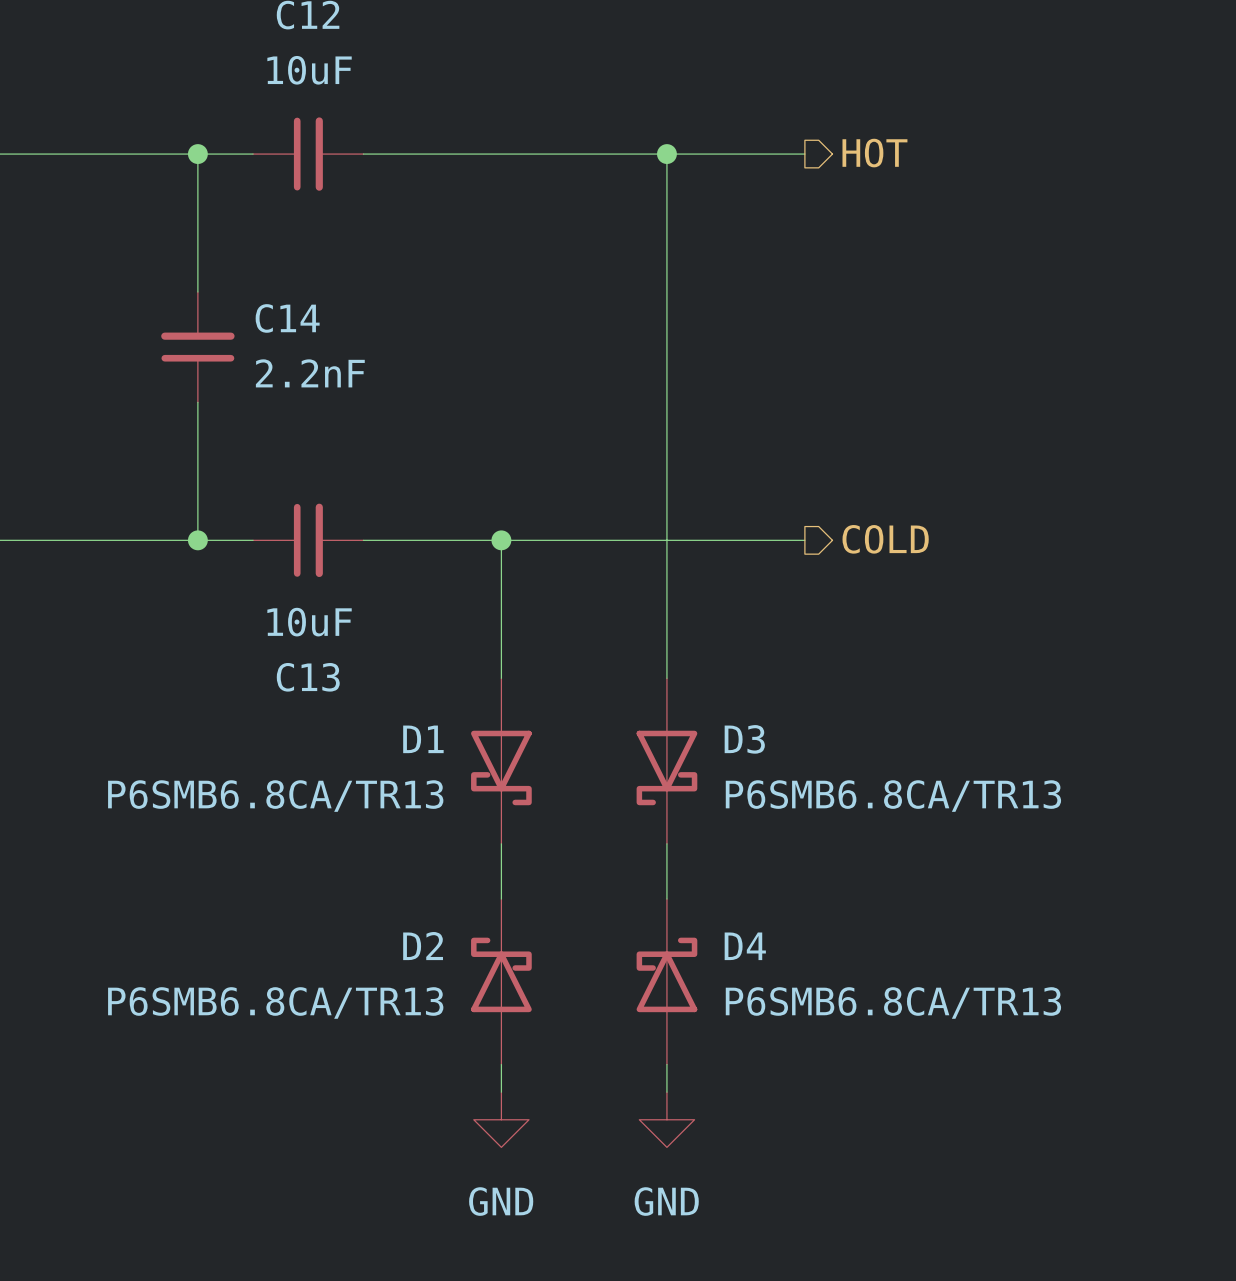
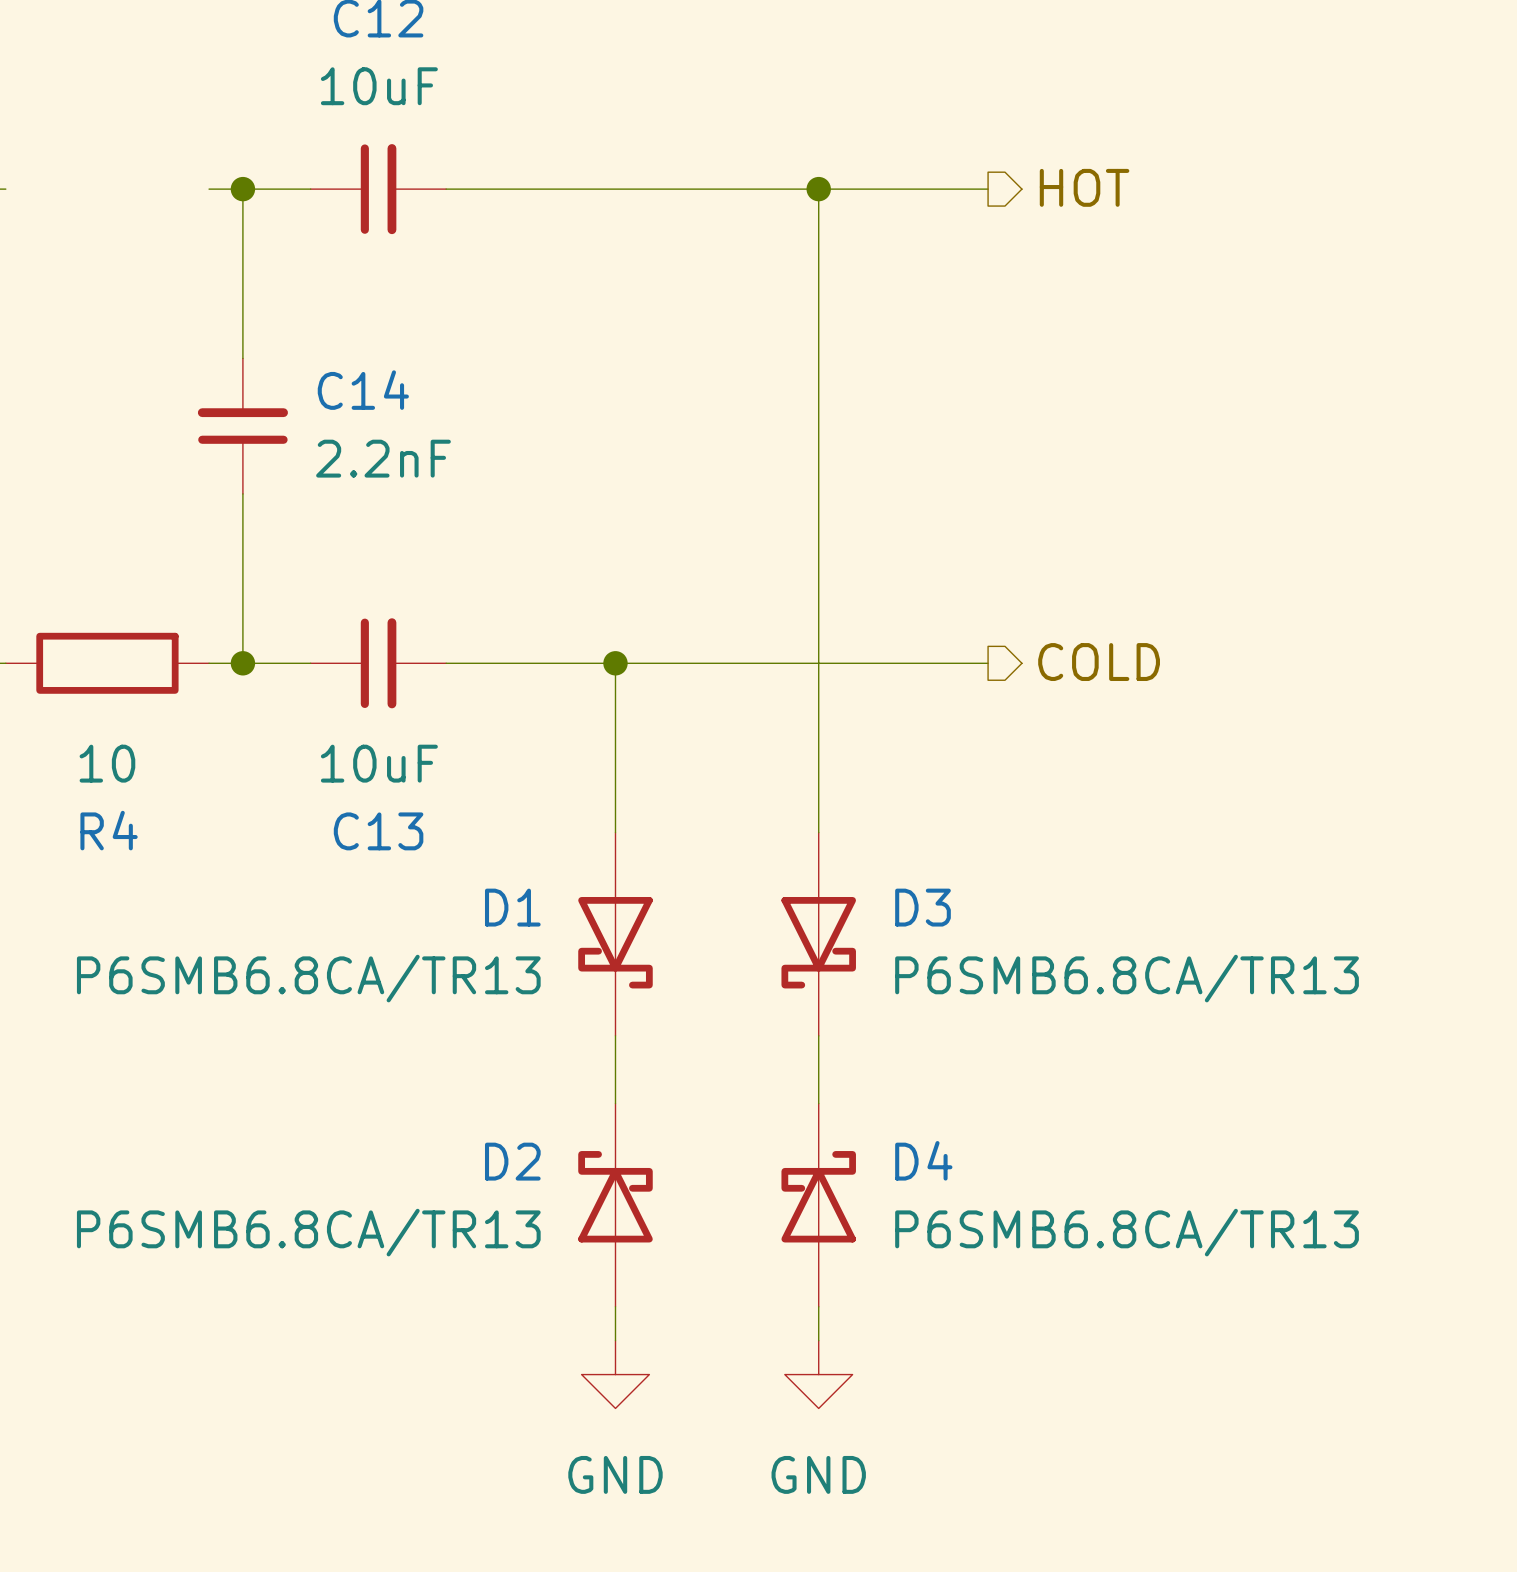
wire: (4, 154) (170, 154) -> none
wire: (4, 540) (170, 540) -> none
R4: none -> 10 (107, 663)

